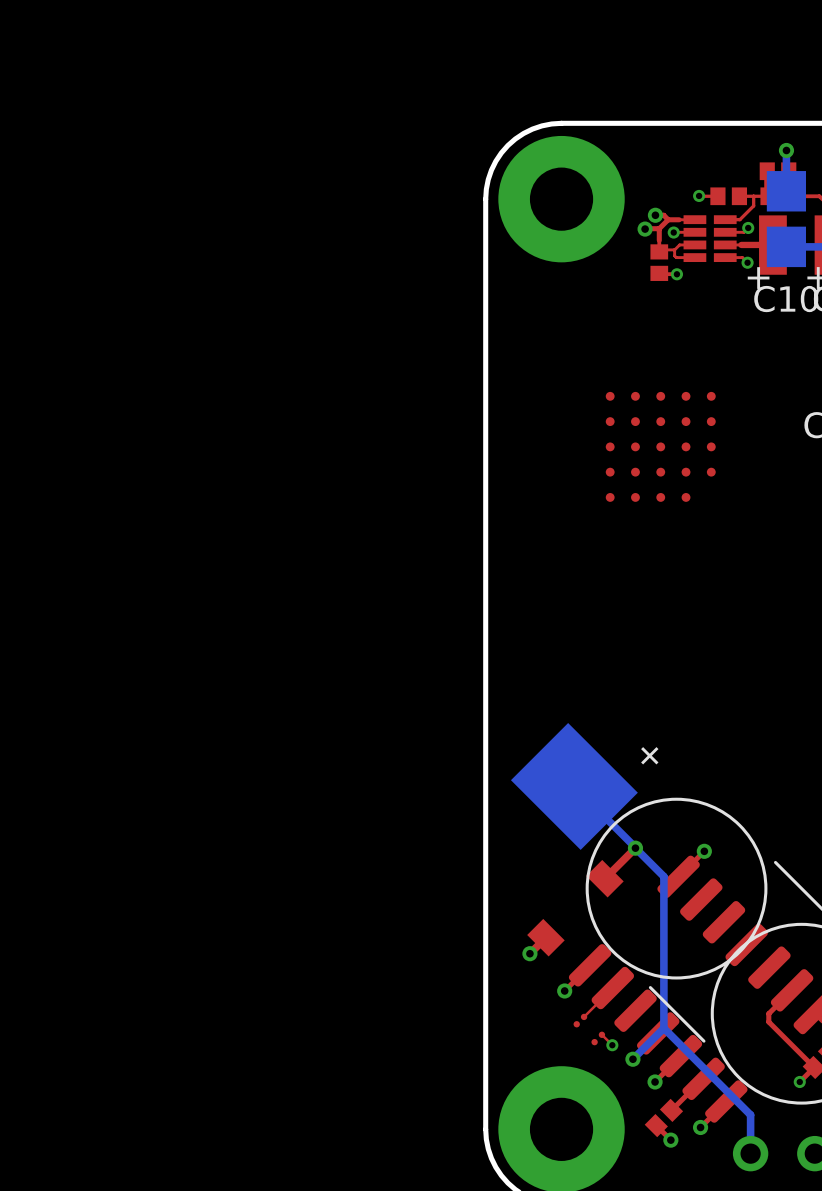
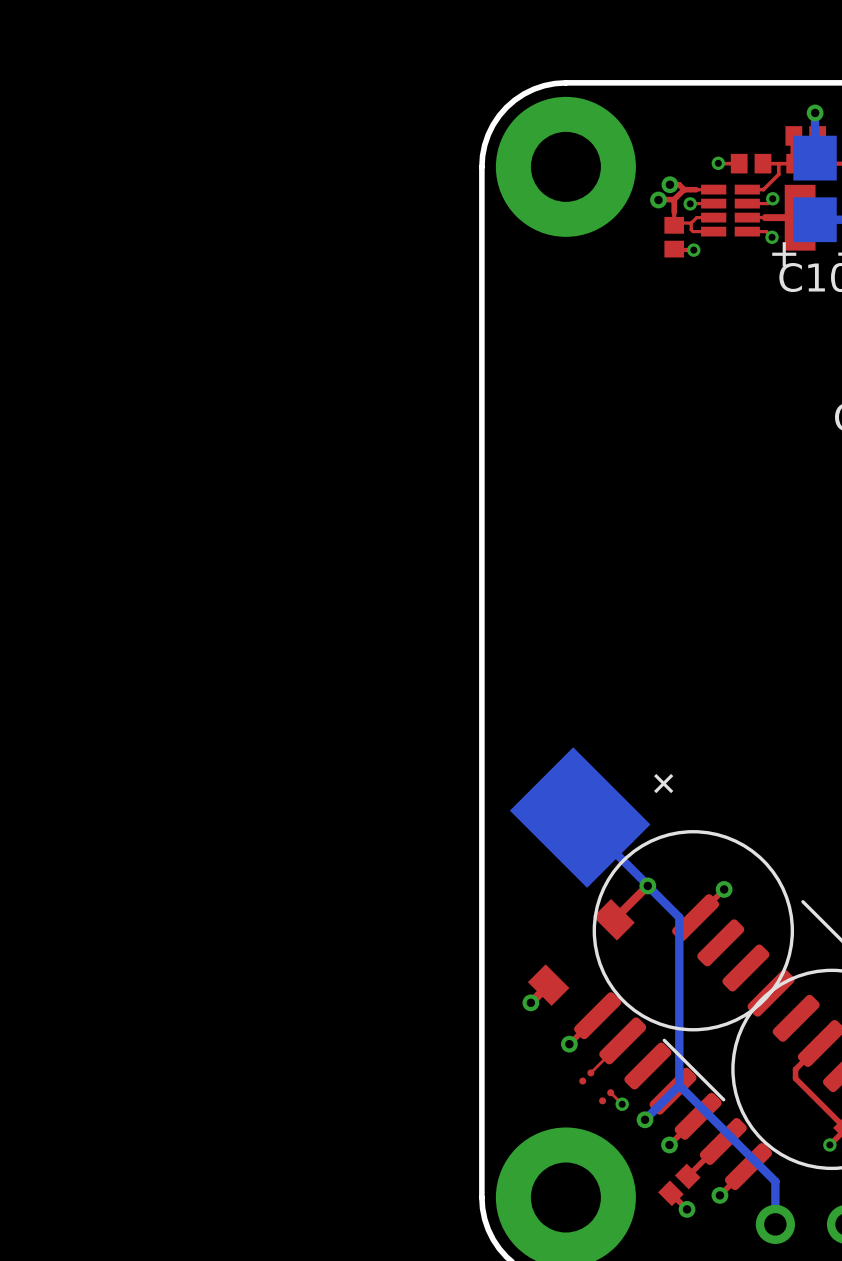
part: (660, 446) -> none

